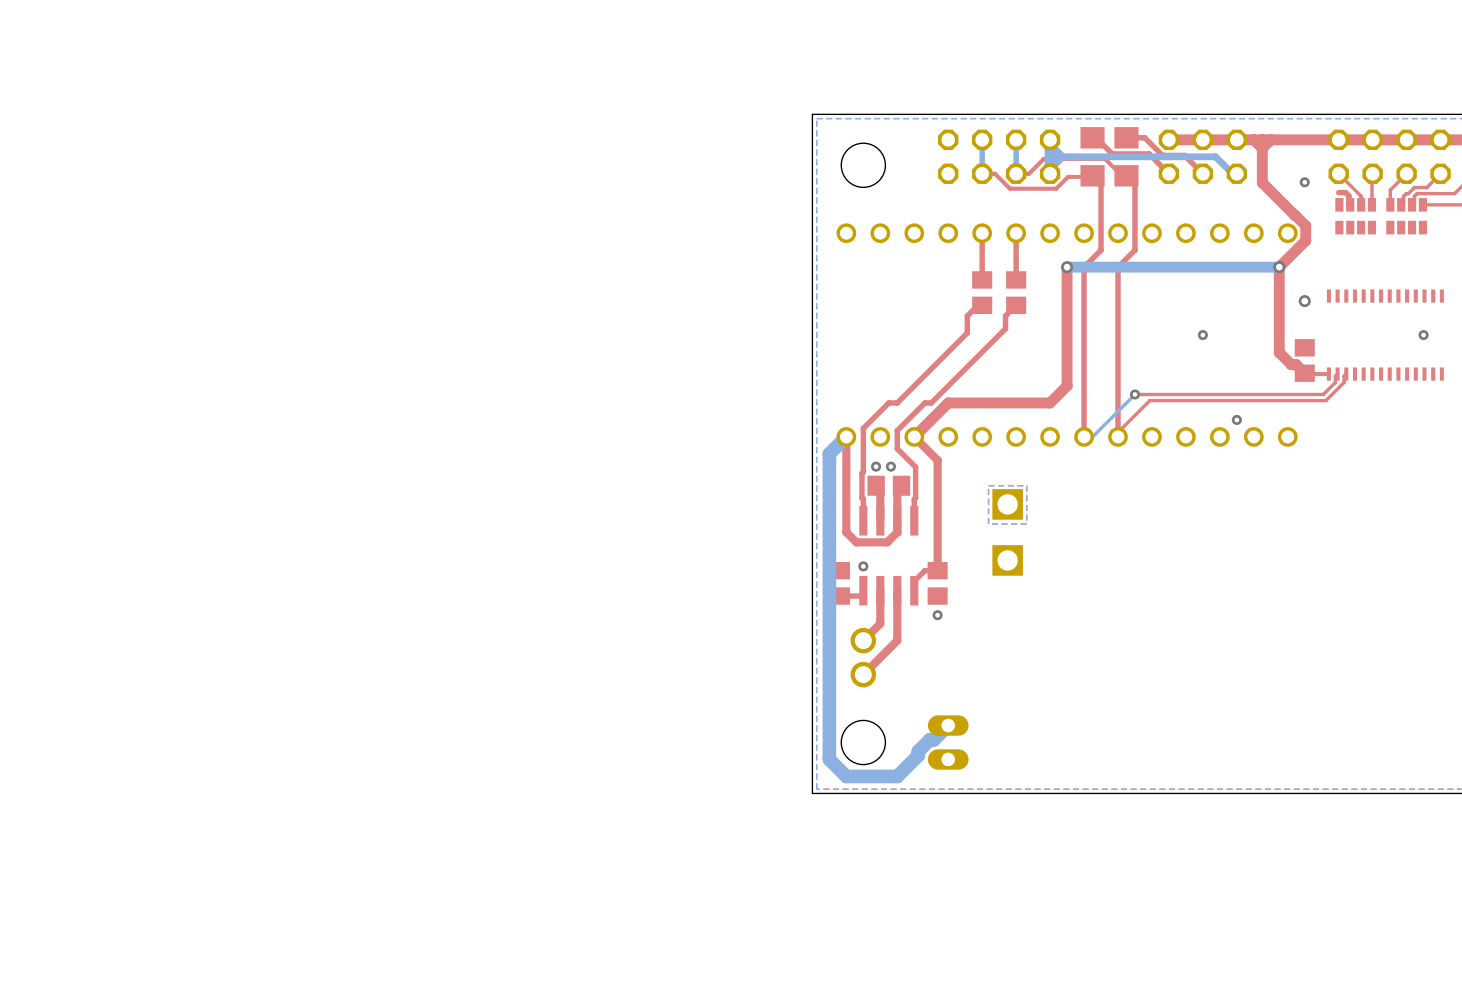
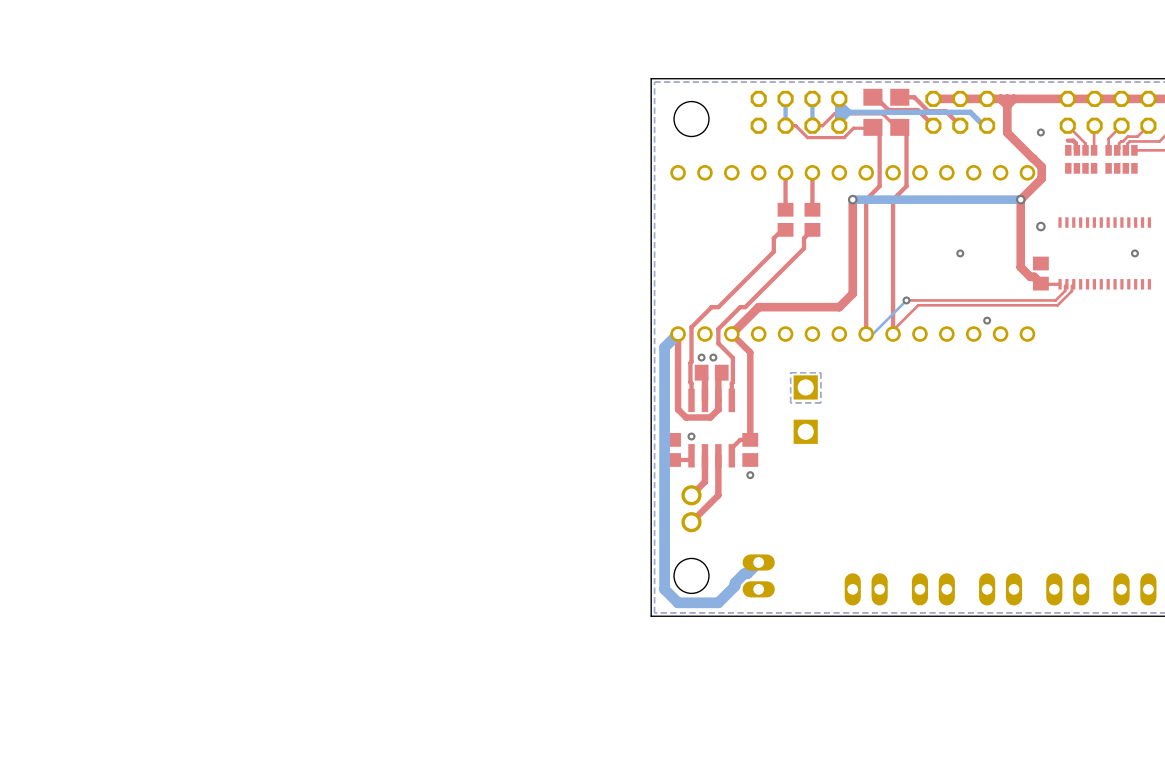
part: none -> (866, 589)
part: none -> (933, 589)
part: none -> (1000, 589)
part: none -> (1067, 589)
part: none -> (1134, 589)

